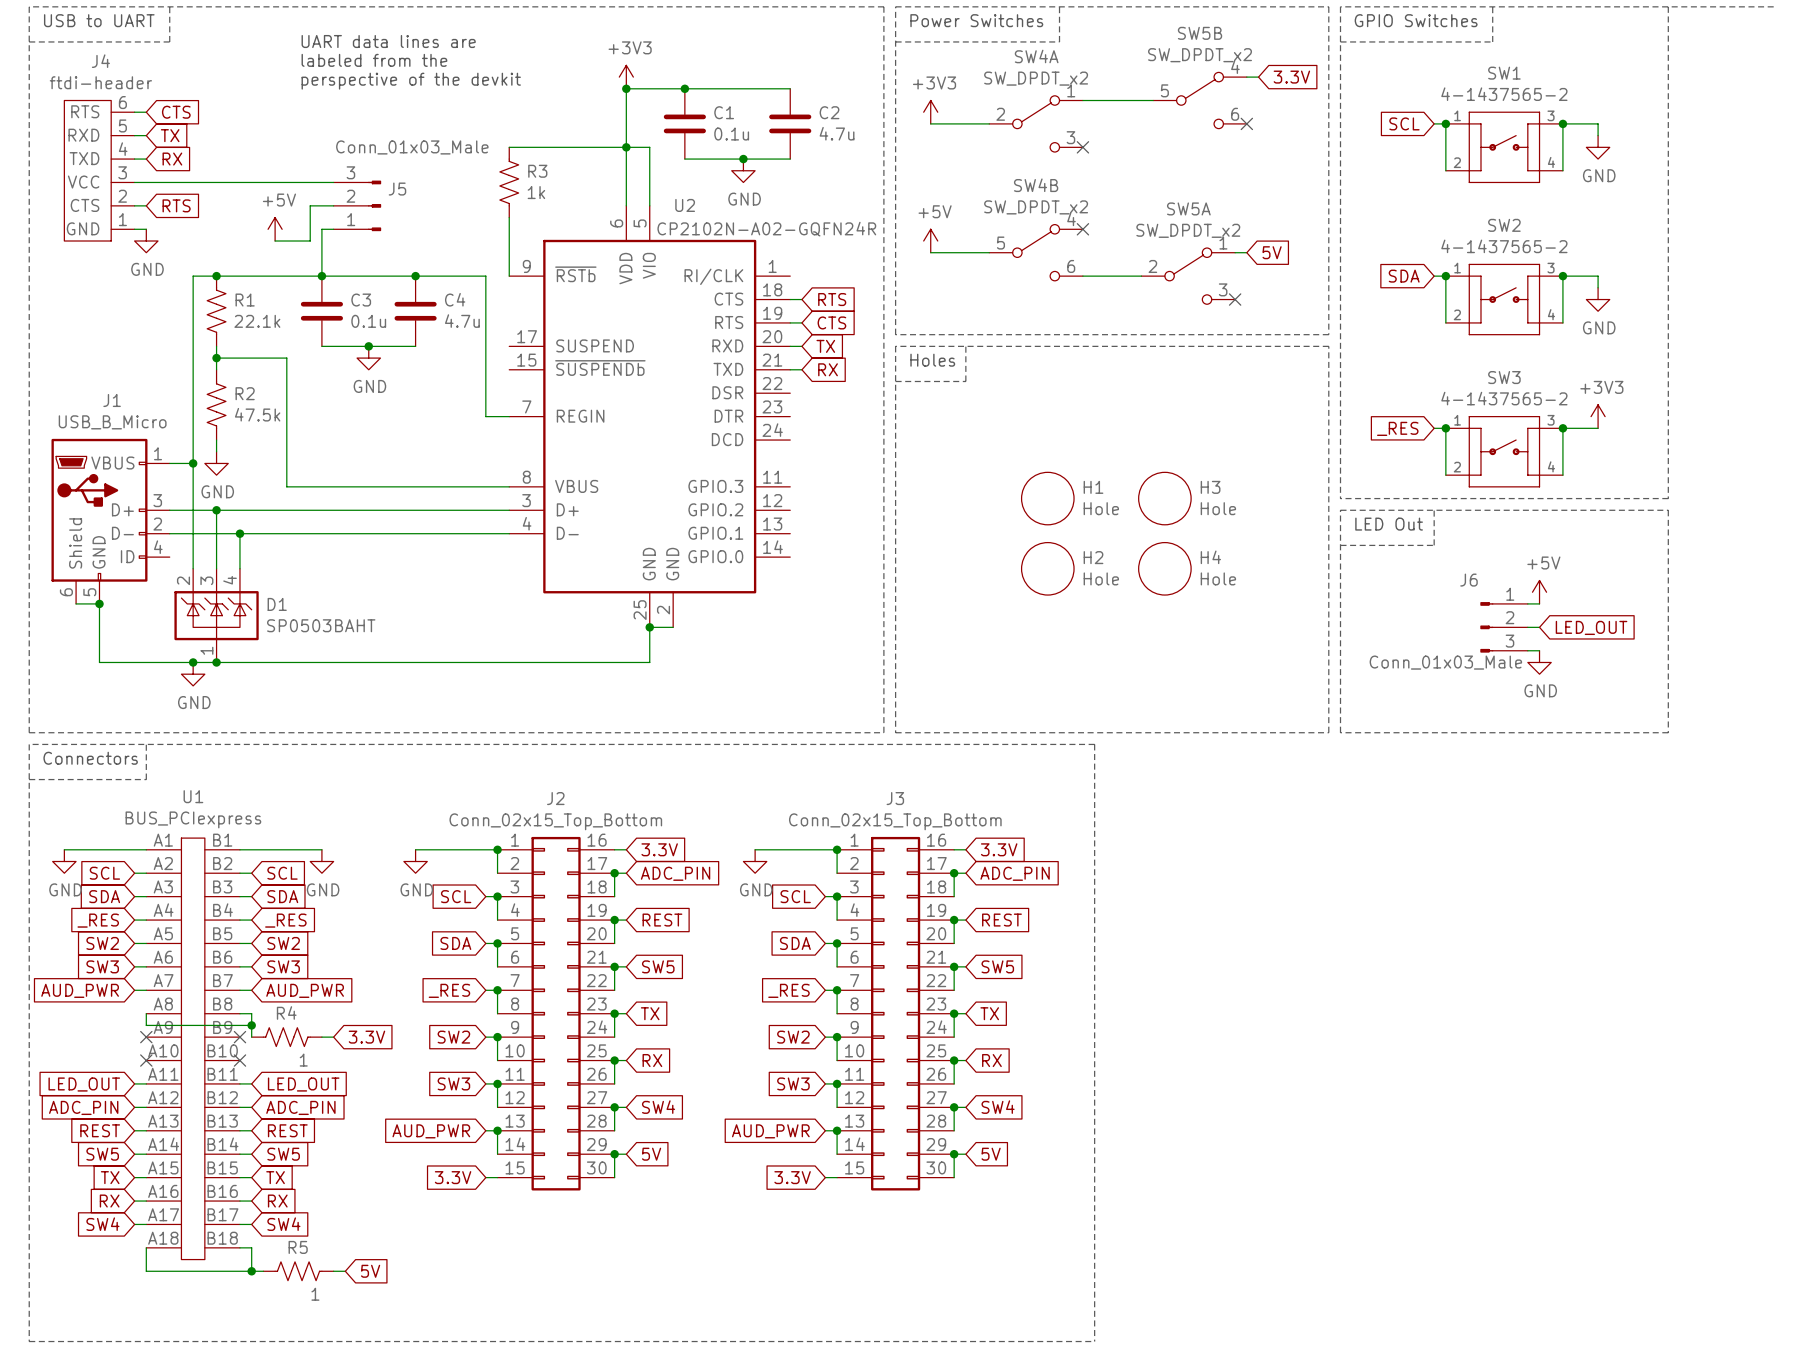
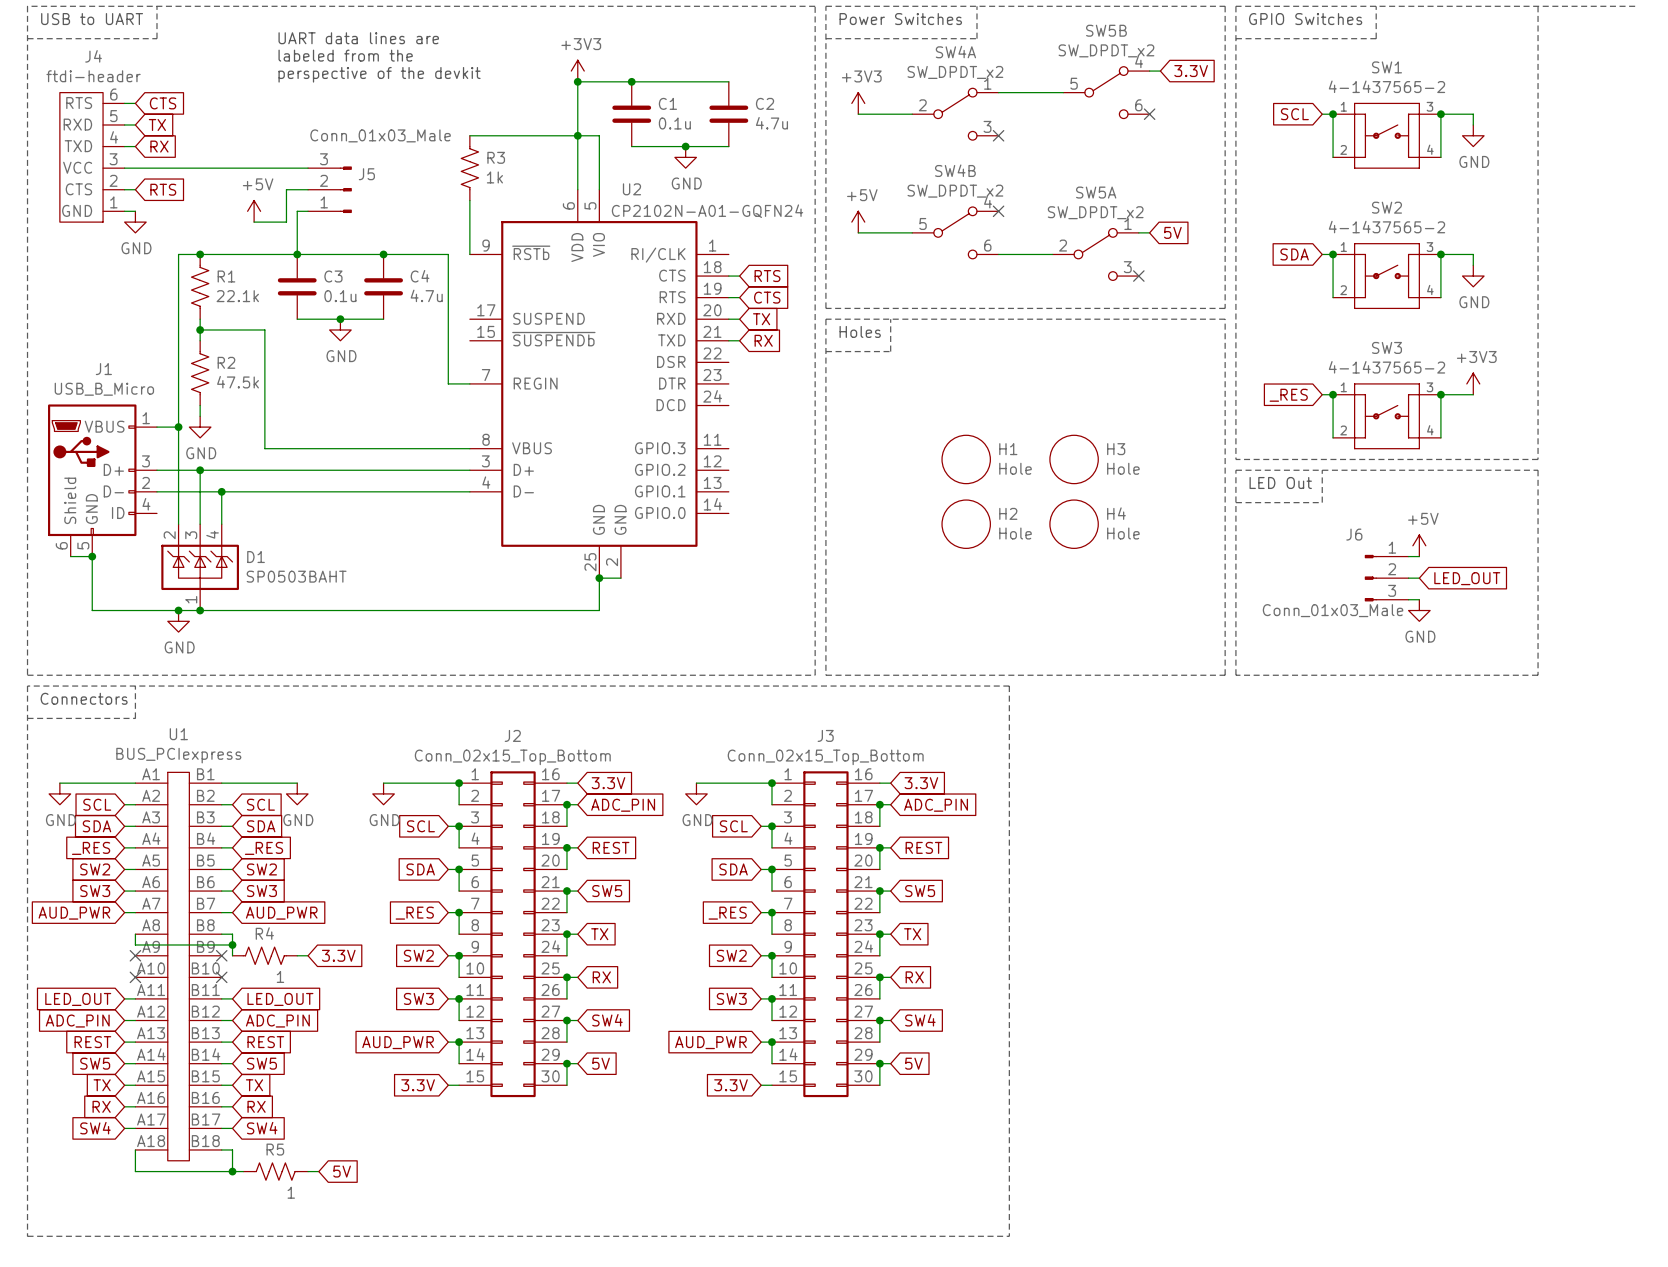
U2 value: CP2102N-A02-GQFN24R (766, 229) -> CP2102N-A01-GQFN24 (707, 211)

